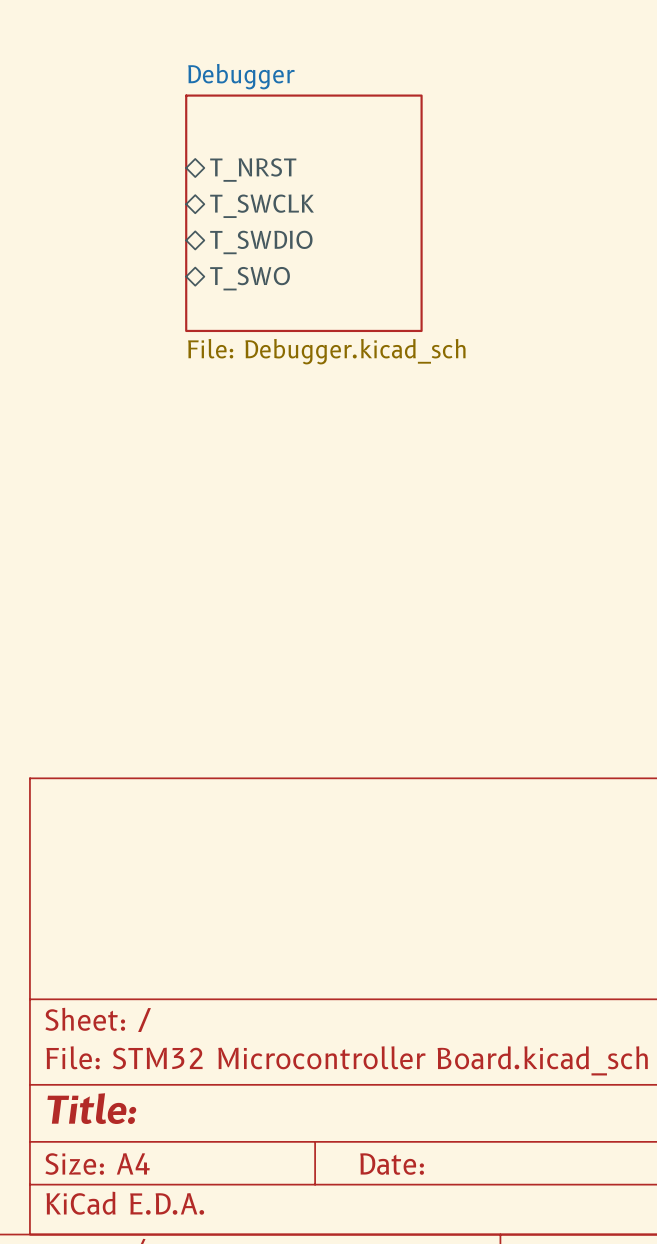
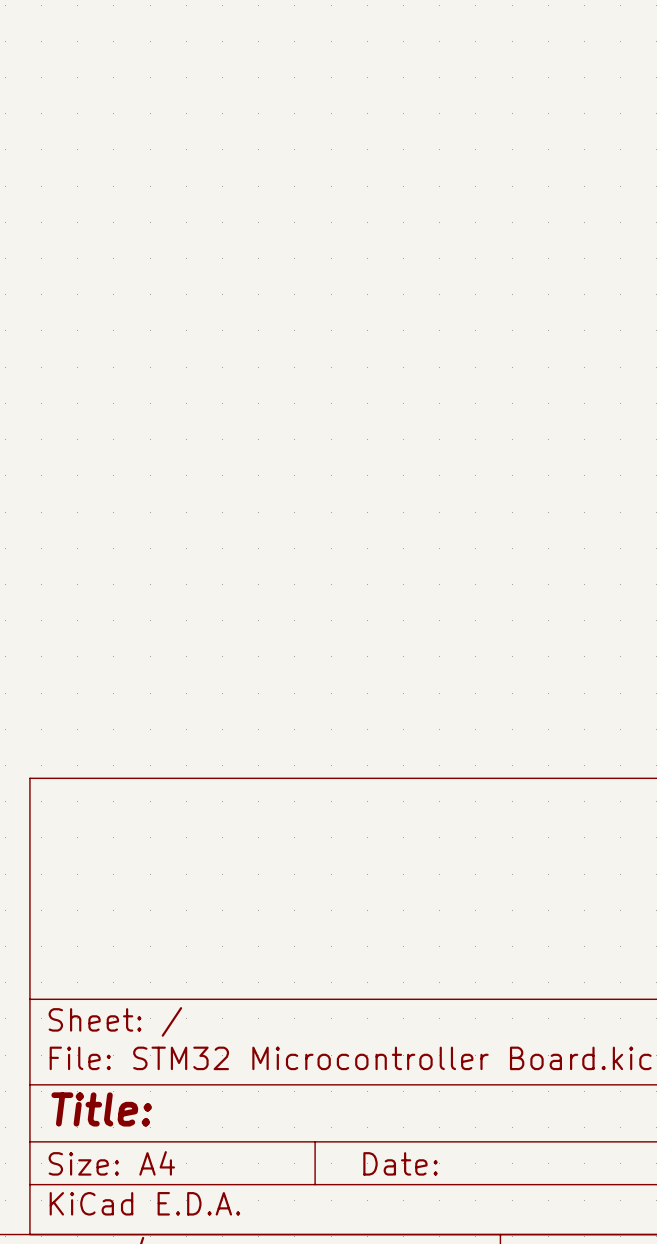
sheet pin: T_NRST (253, 170) -> none
sheet pin: T_SWCLK (262, 206) -> none
sheet Debugger: File: Debugger.kicad_sch (303, 213) -> none
sheet pin: T_SWDIO (261, 242) -> none
sheet pin: T_SWO (250, 278) -> none

